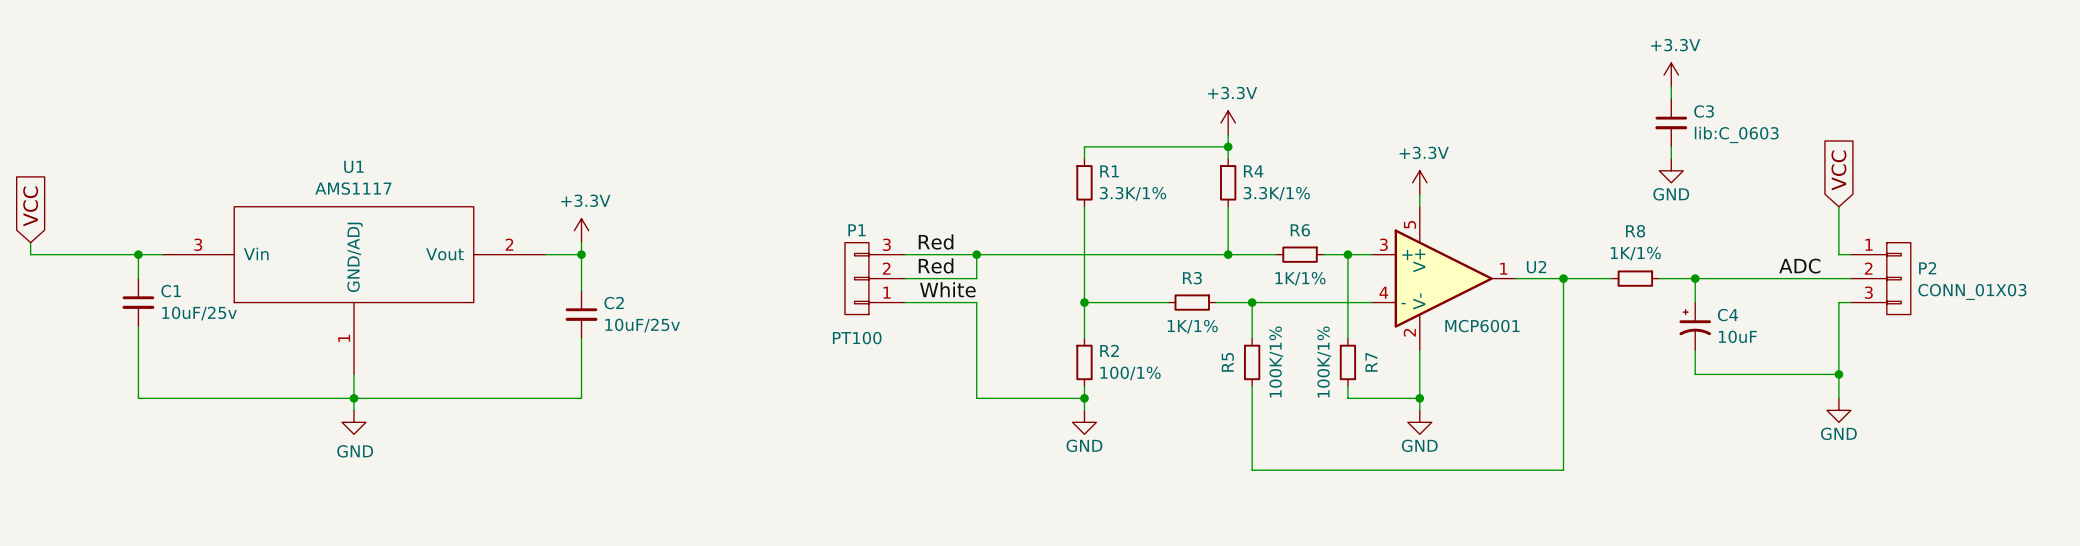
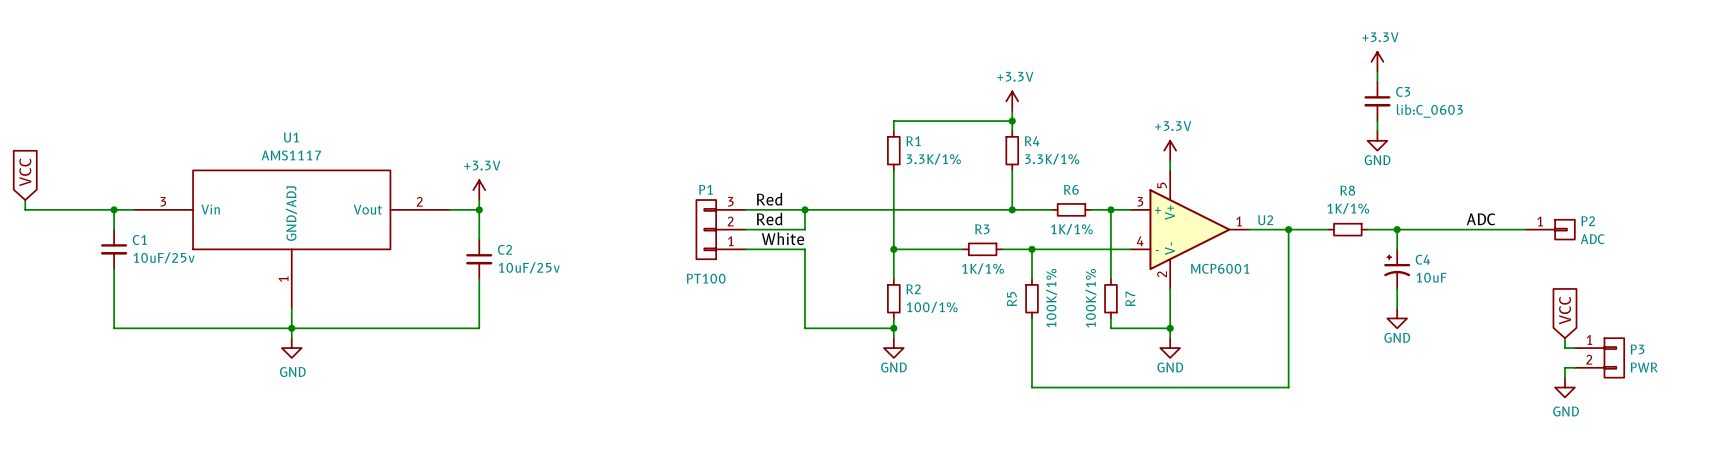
global label position: VCC (1838, 170) -> VCC (1565, 310)
wire: (1838, 206) (1838, 254) (1850, 254) -> none
P2 symbol: [1850, 242, 1911, 315] -> [1525, 219, 1575, 240]
P2 value: CONN_01X03 (1972, 291) -> ADC (1592, 239)
wire: (1850, 302) (1838, 302) (1838, 398) -> none
wire: (1695, 374) (1838, 374) -> none
junction: (1838, 374) -> none
power symbol: none -> GND (1397, 318)
power symbol: GND (1838, 410) -> none
wire: none -> (1564, 338) (1564, 348) (1574, 348)
P3: none -> PWR (1599, 357)
wire: none -> (1574, 367) (1564, 367) (1564, 377)
power symbol: none -> GND (1564, 387)

